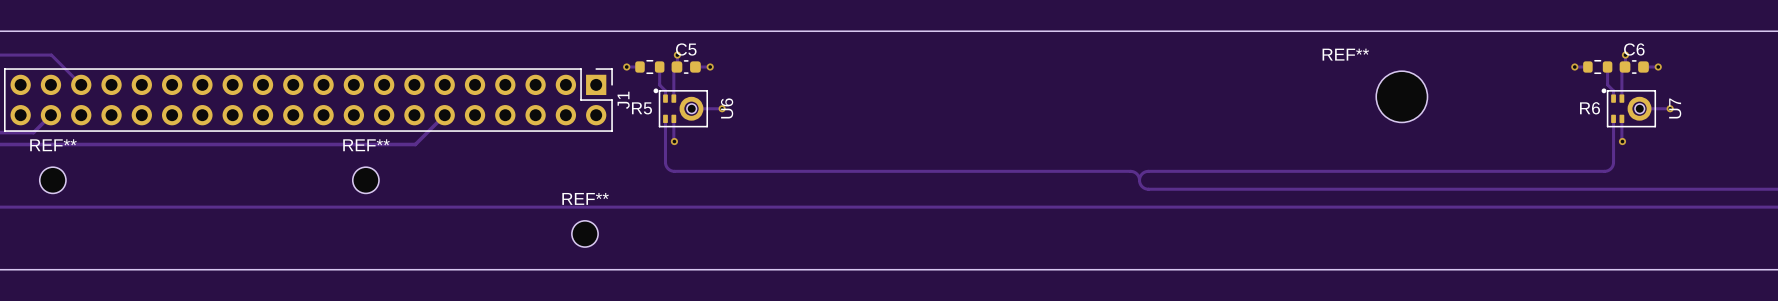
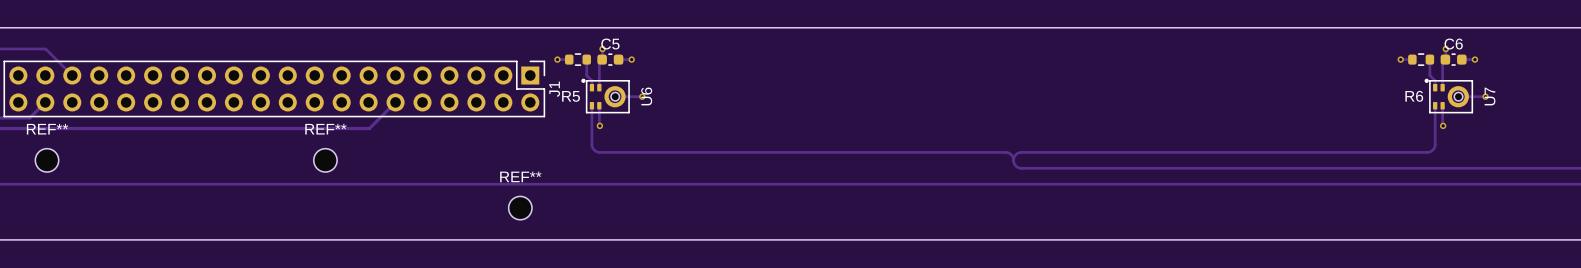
REF**: (1401, 96) -> none

